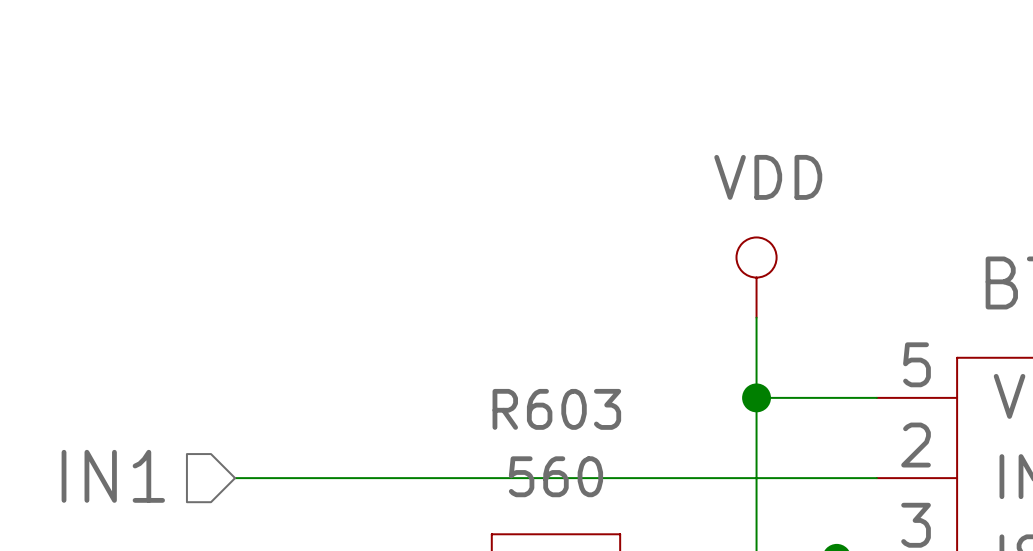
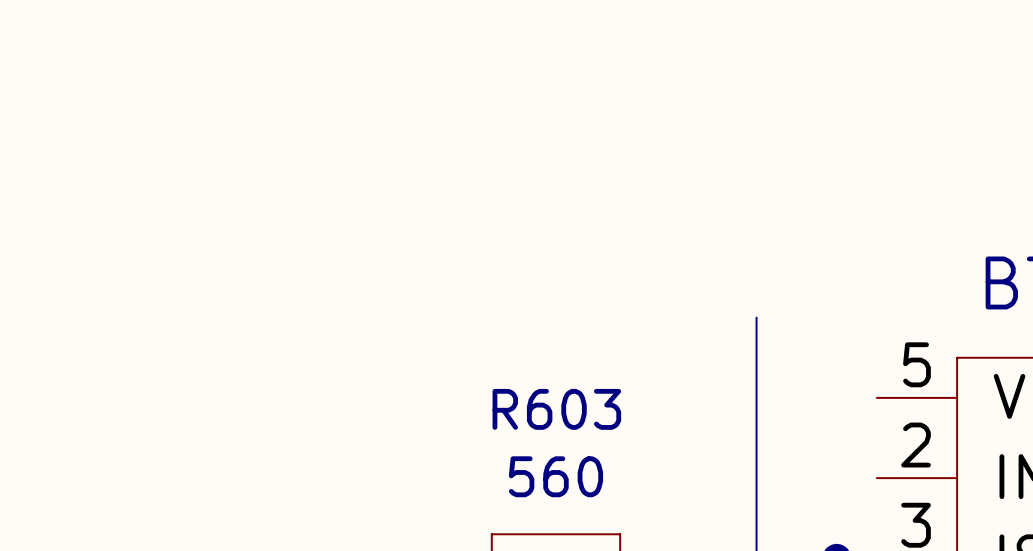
power symbol: VDD (756, 277) -> none
wire: (756, 397) (876, 397) -> none
junction: (756, 397) -> none
hierarchical label: IN1 (113, 476) -> none
wire: (235, 478) (876, 478) -> none

